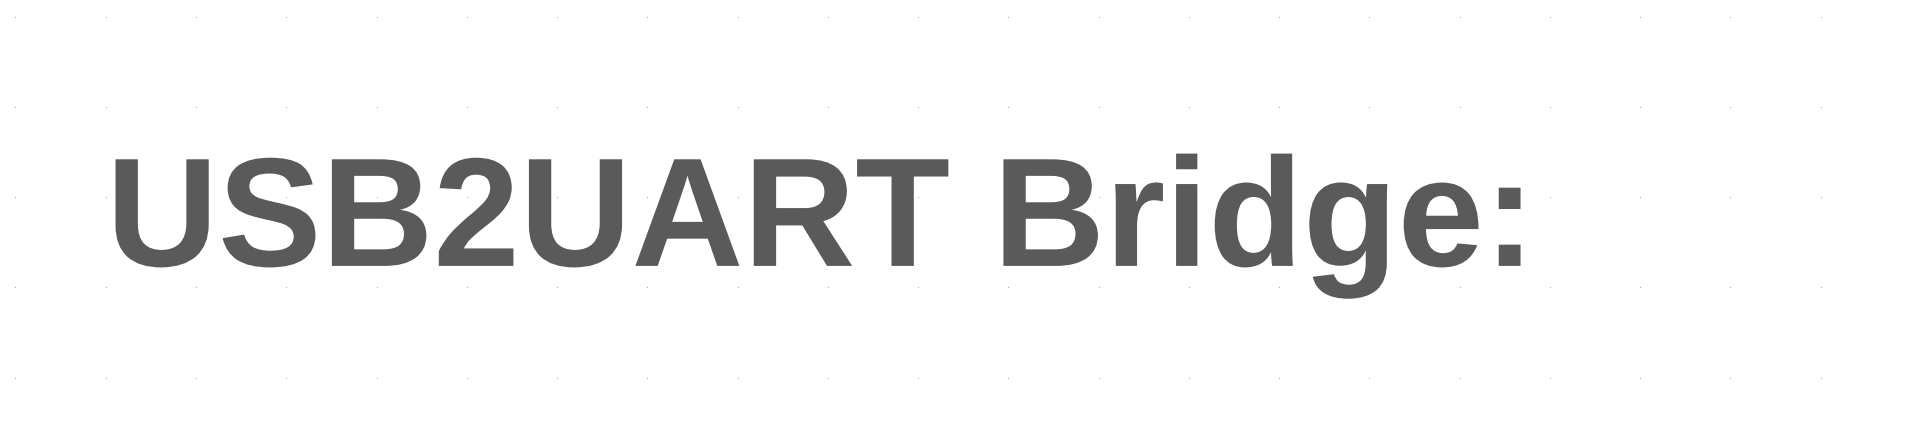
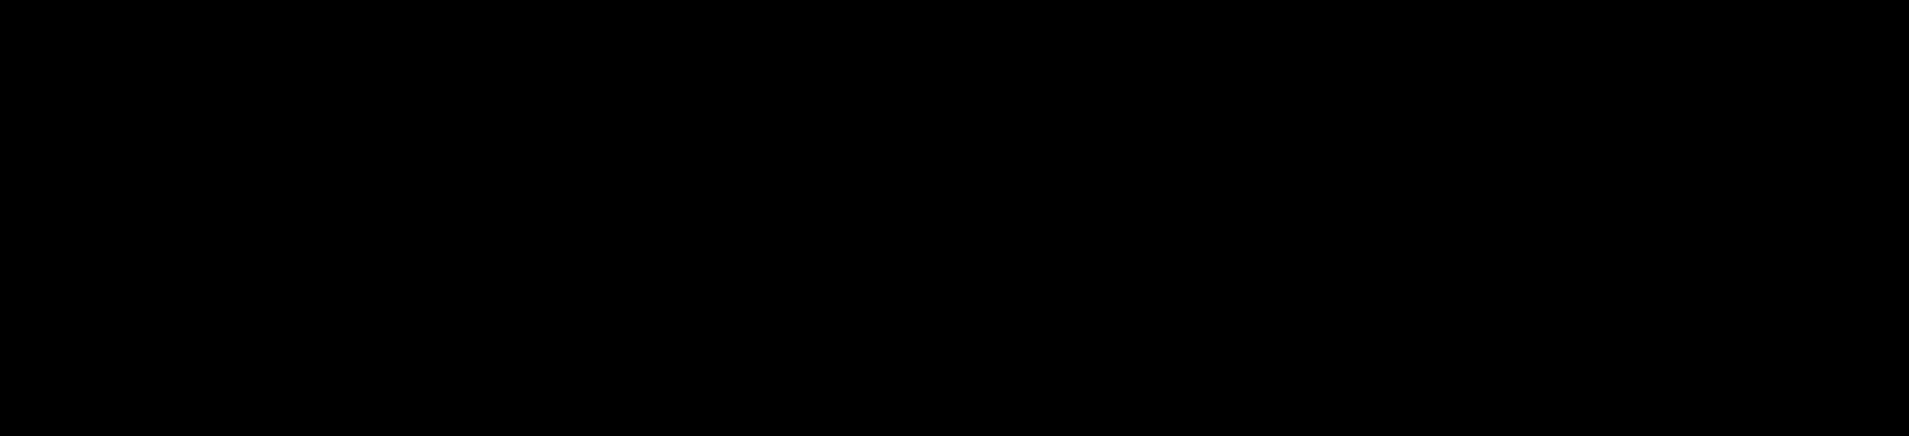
text: USB2UART Bridge: (818, 226) -> none

